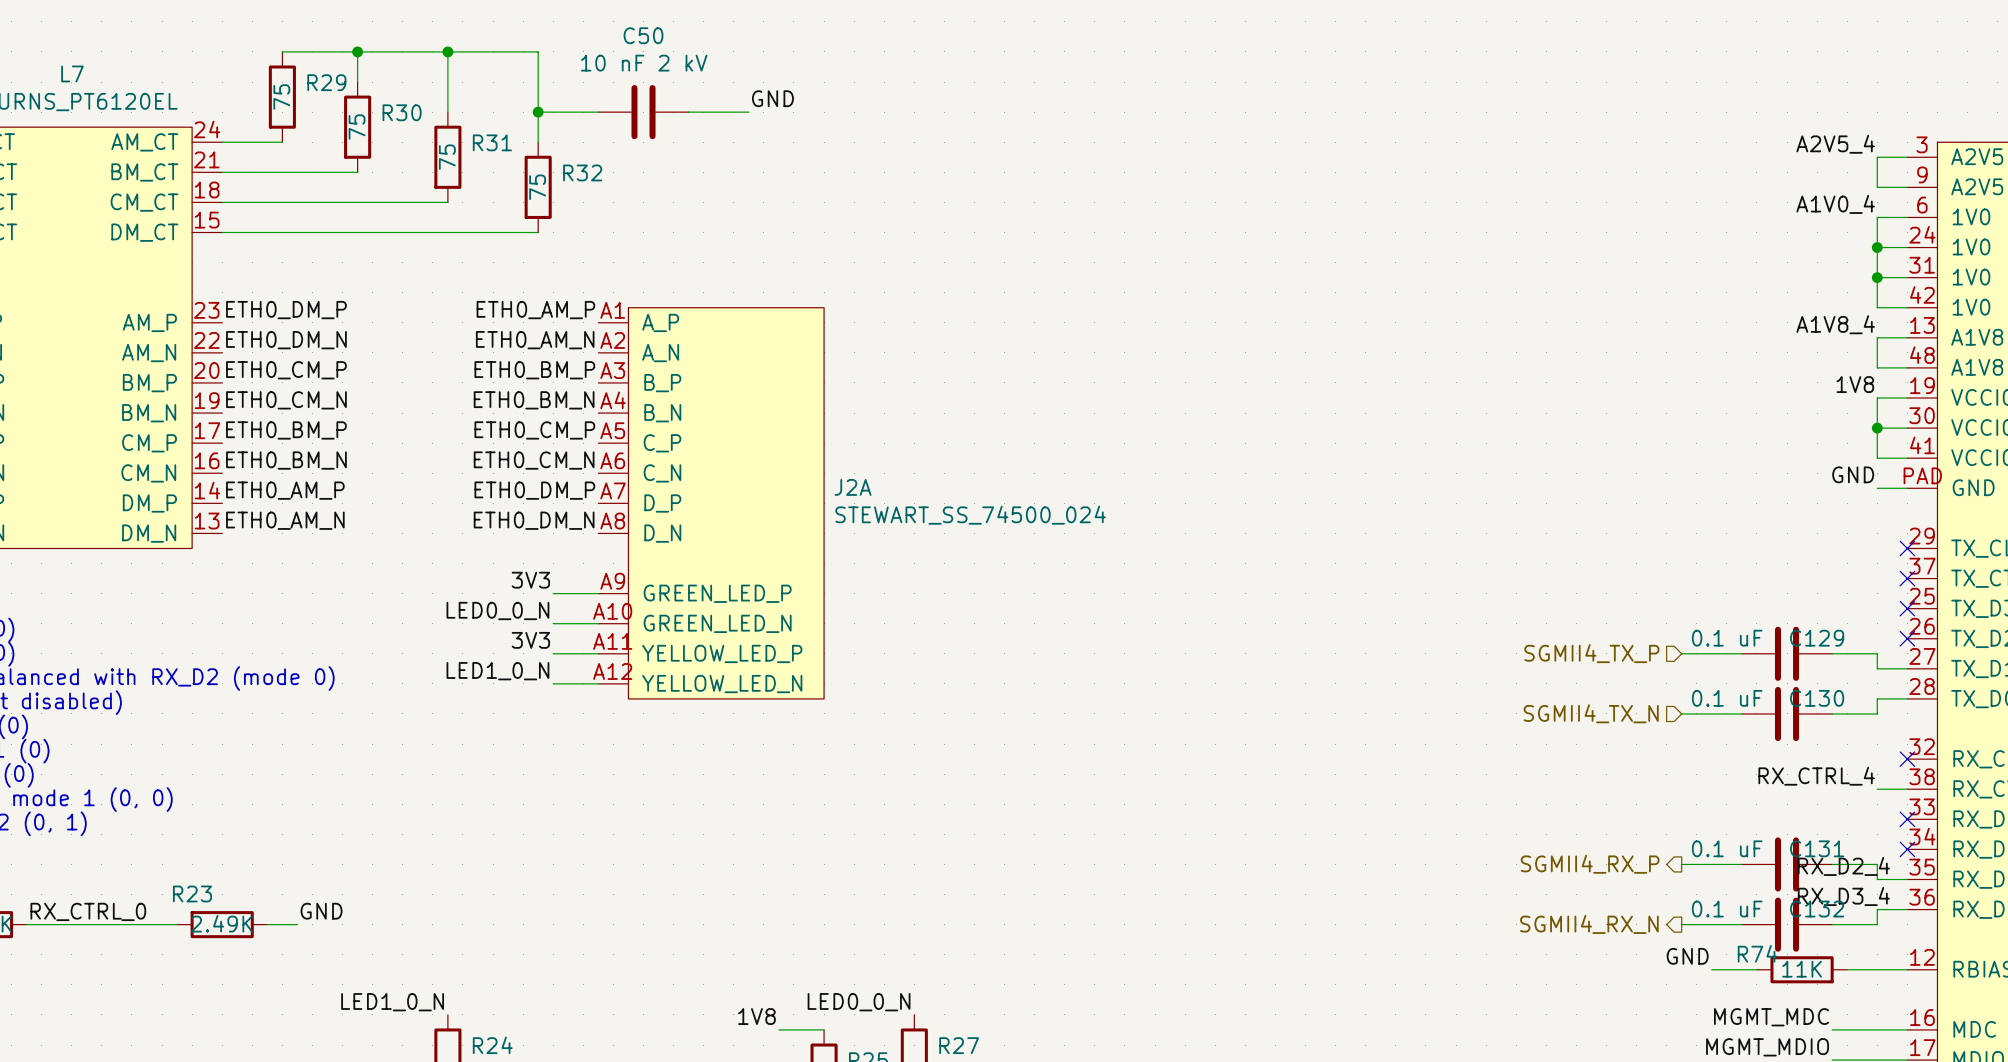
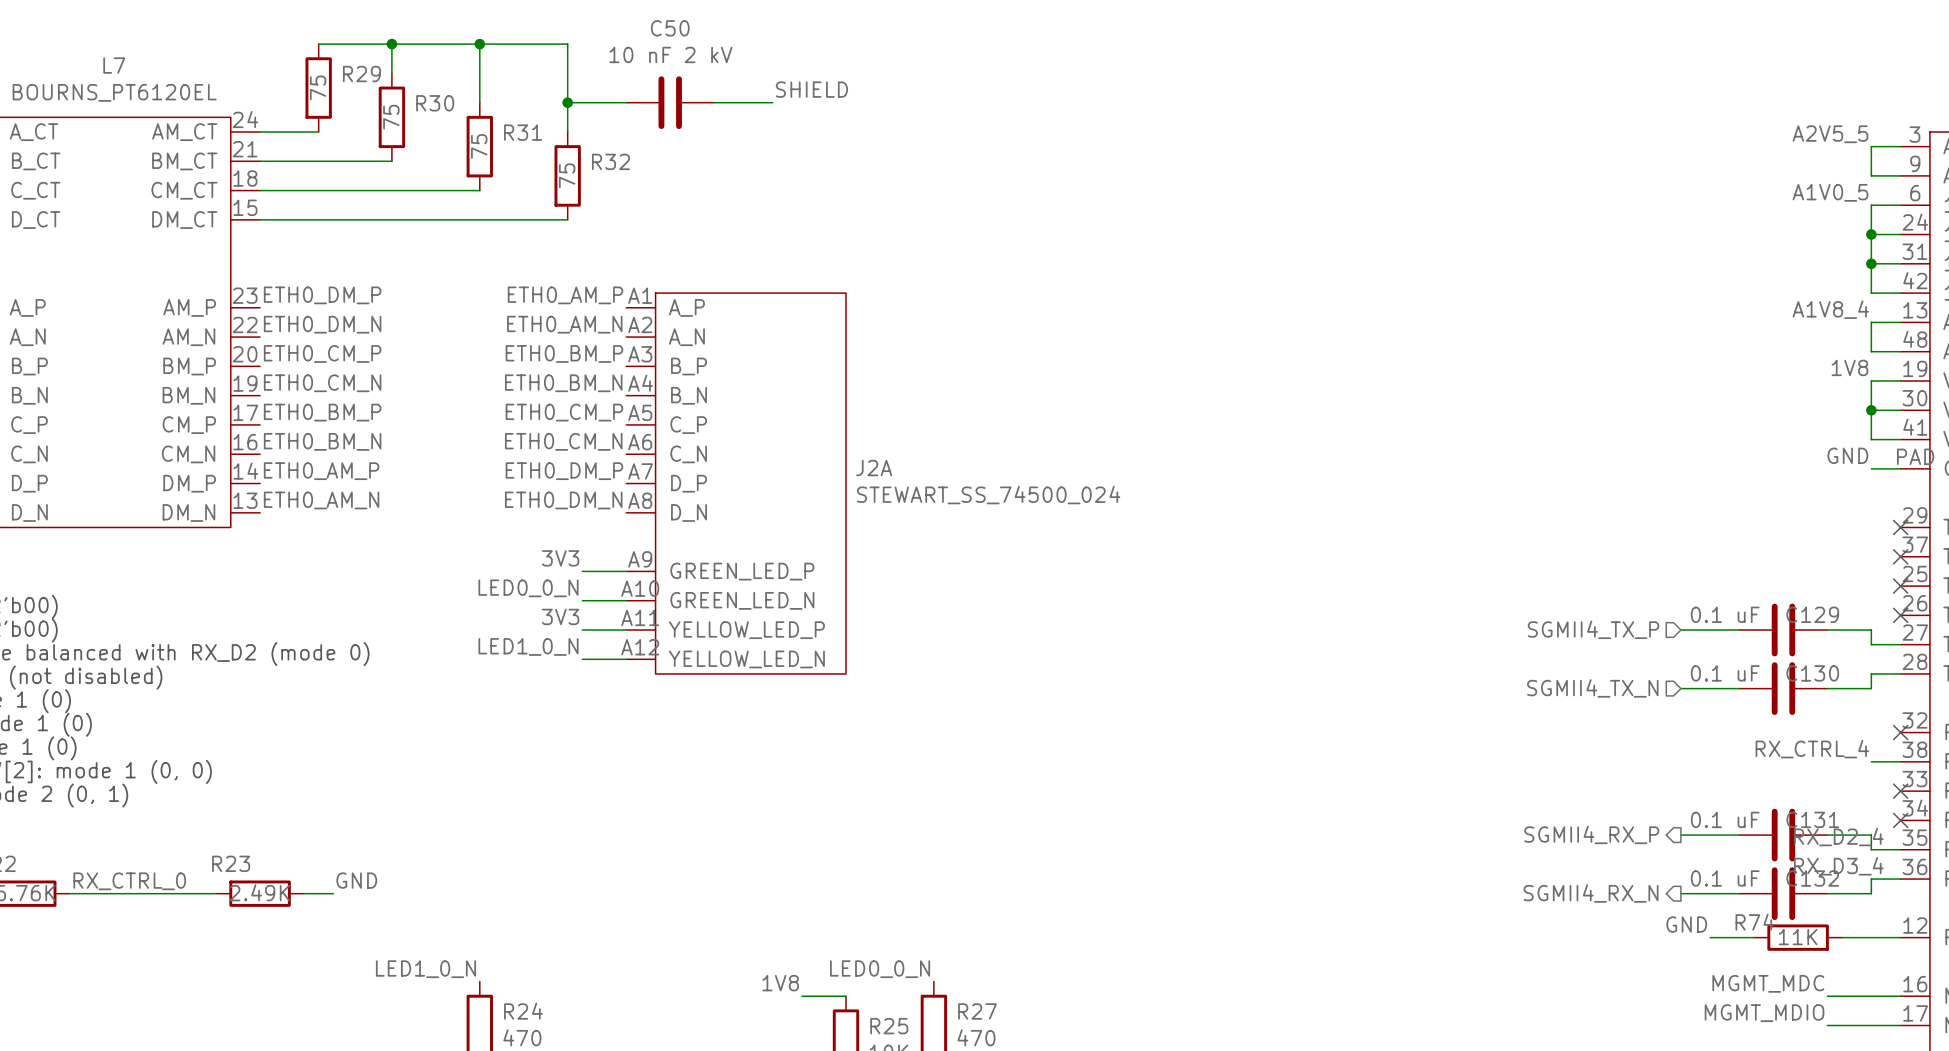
label: GND (772, 98) -> SHIELD (811, 89)
label: A2V5_4 (1835, 144) -> A2V5_5 (1830, 134)
label: A1V0_4 (1835, 204) -> A1V0_5 (1830, 192)

